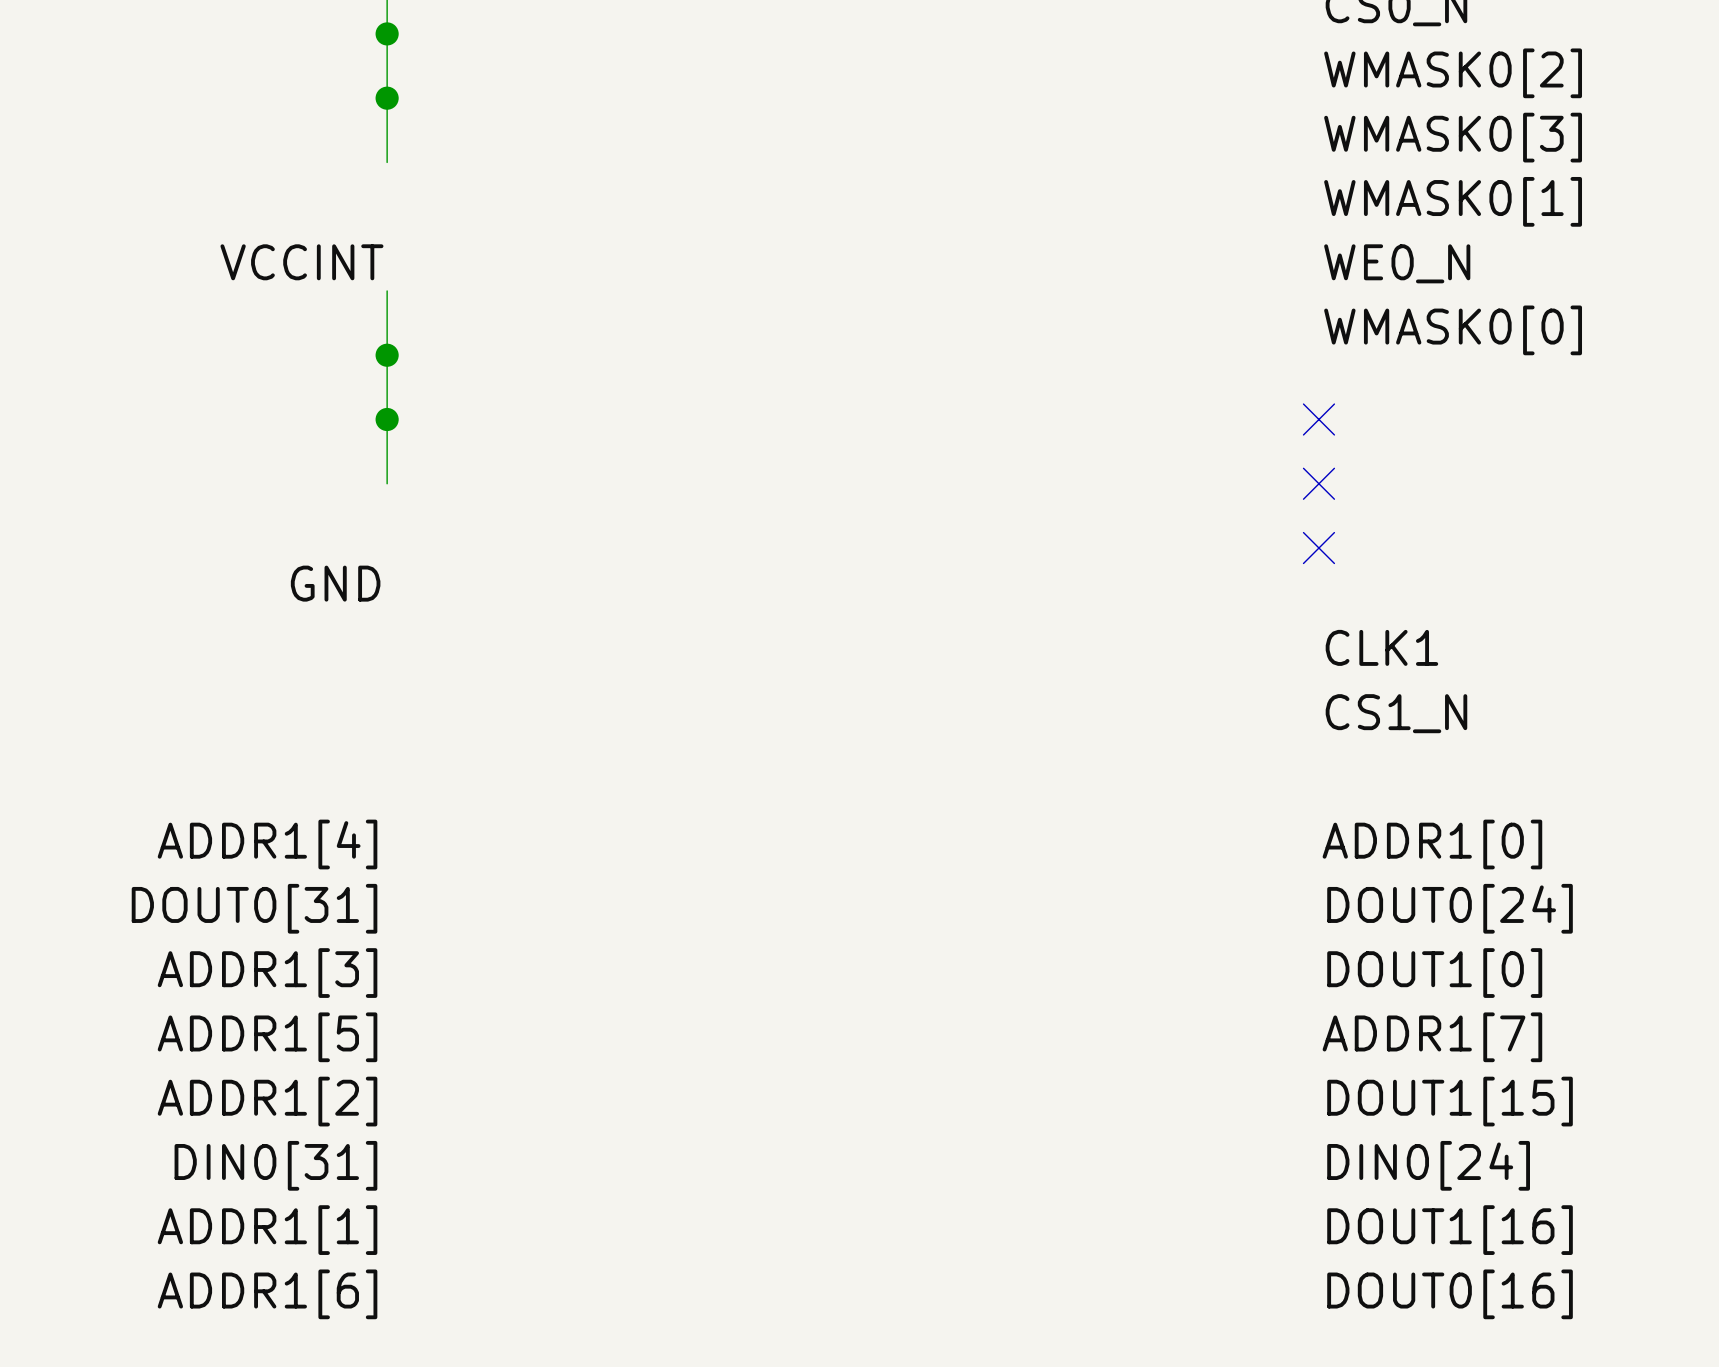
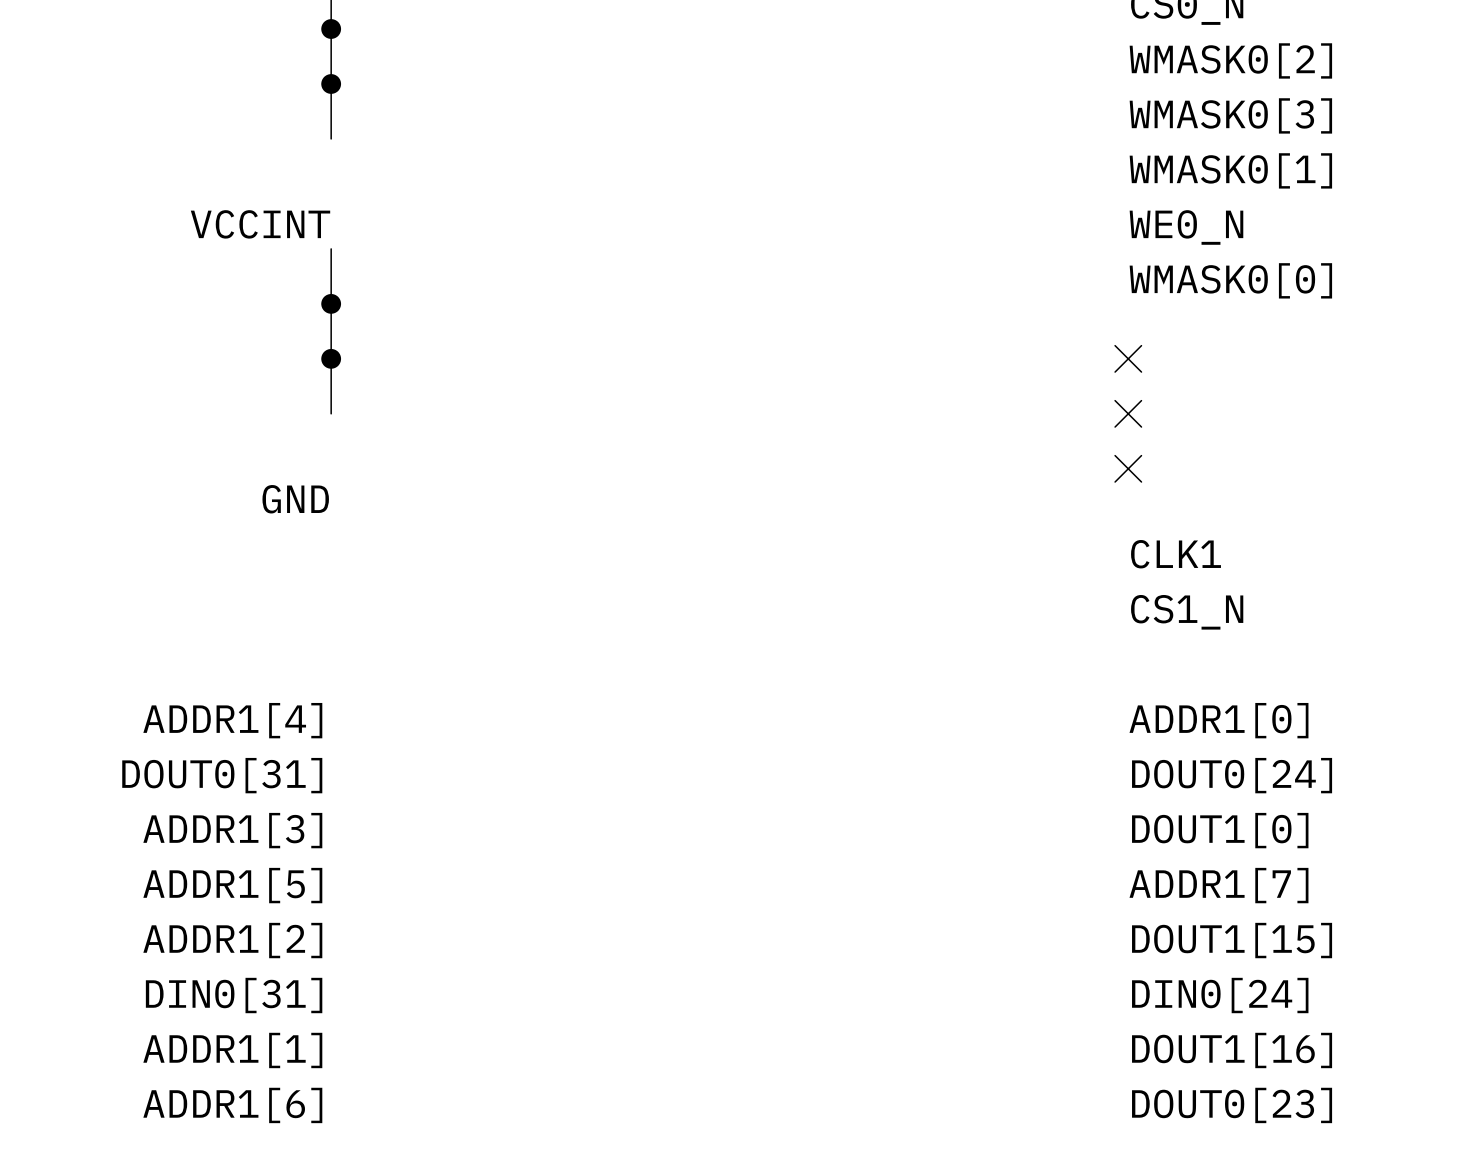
label: DOUT0[16] (1450, 1294) -> DOUT0[23] (1232, 1105)

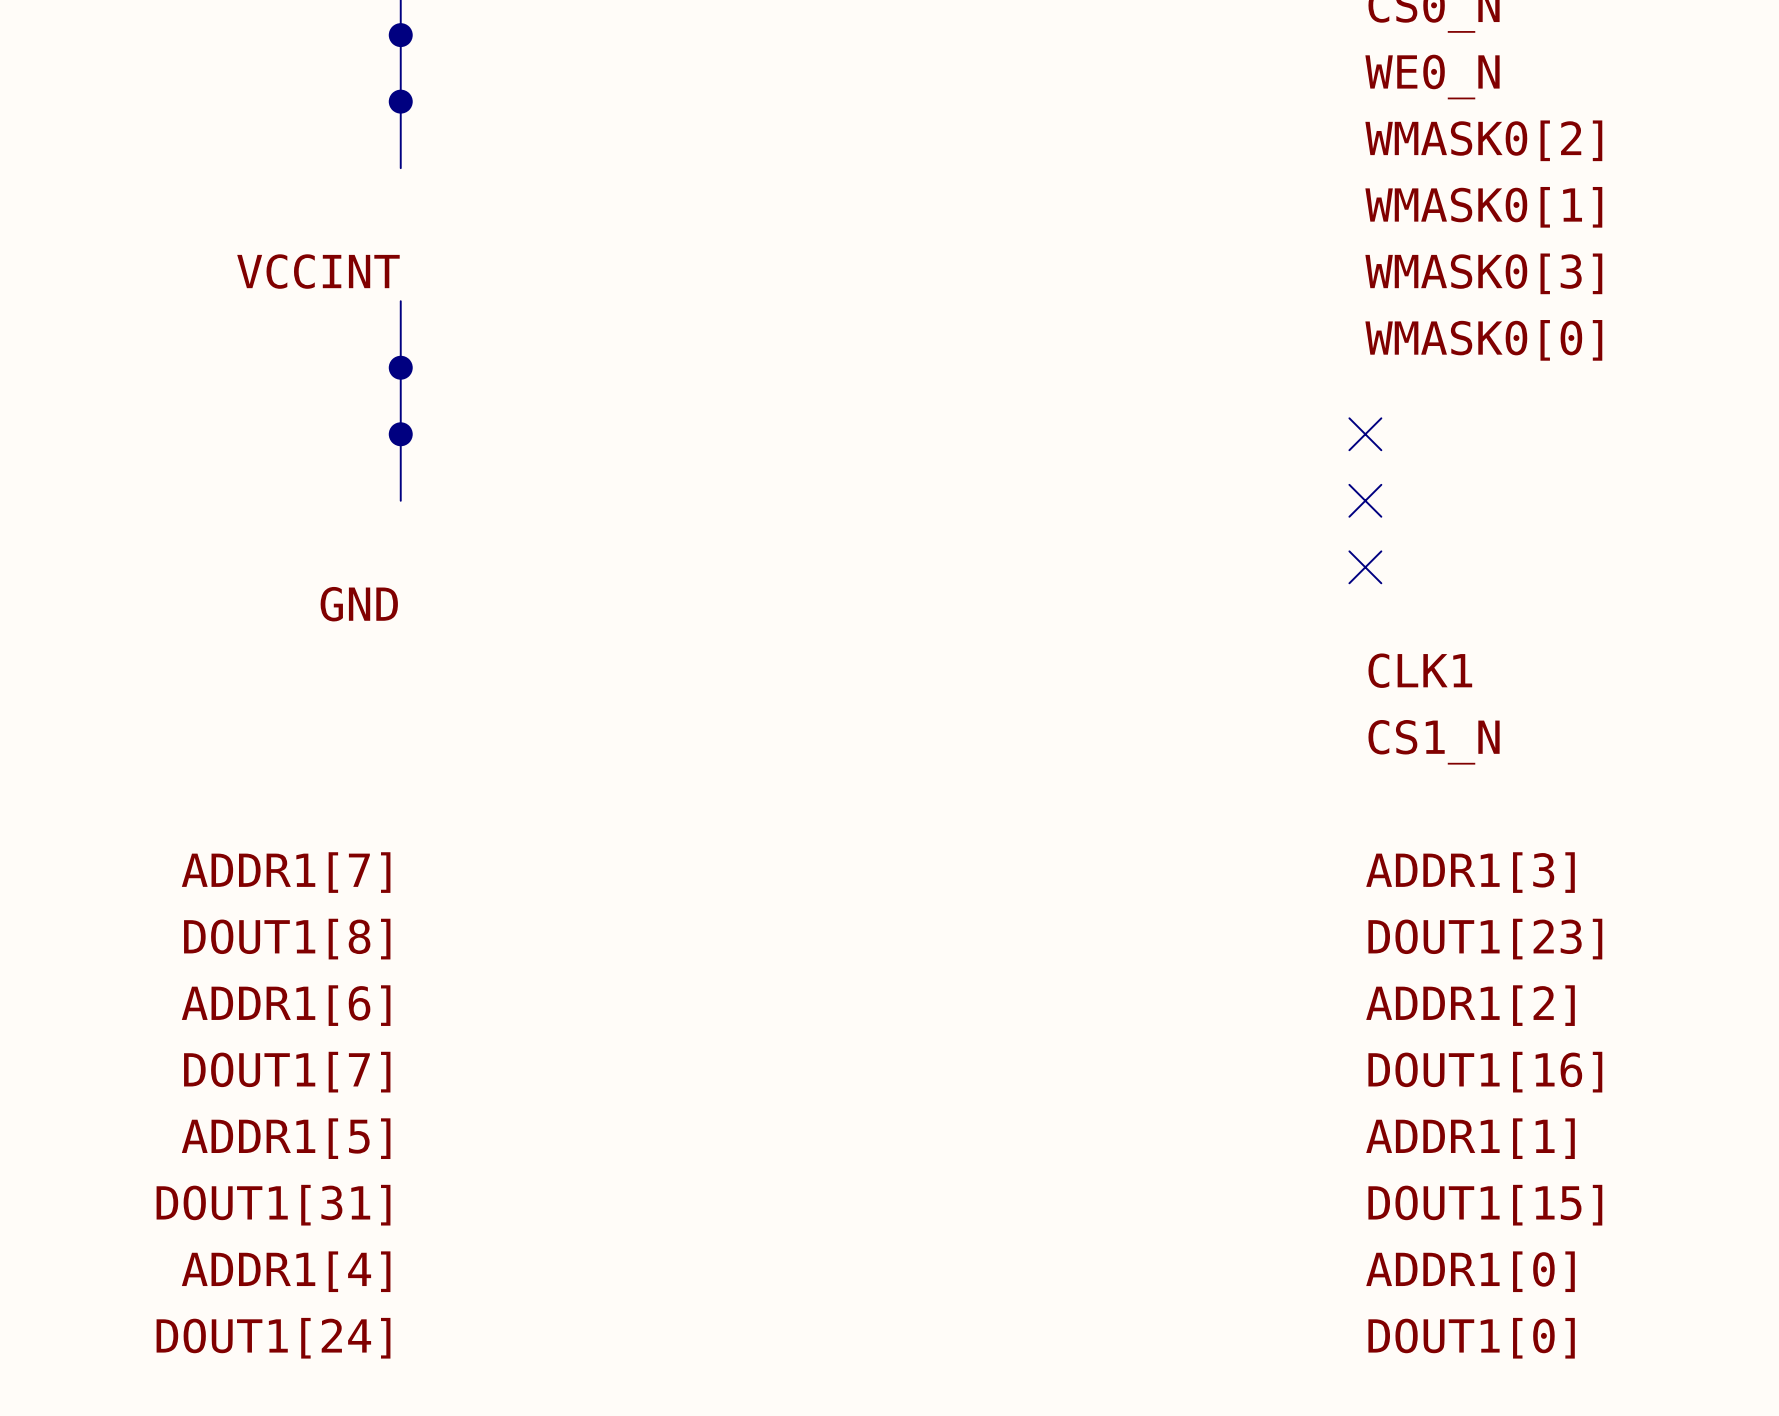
label: WMASK0[2] (1230, 60) -> WE0_N (1432, 77)
label: WMASK0[3] (1230, 115) -> WMASK0[2] (1483, 140)
label: WE0_N (1186, 227) -> WMASK0[3] (1483, 273)
label: ADDR1[4] (232, 720) -> ADDR1[7] (286, 872)
label: ADDR1[0] (1218, 720) -> ADDR1[3] (1470, 872)
label: DOUT0[31] (222, 775) -> DOUT1[8] (287, 939)
label: DOUT0[24] (1232, 775) -> DOUT1[23] (1485, 939)
label: ADDR1[3] (232, 830) -> ADDR1[6] (286, 1005)
label: DOUT1[0] (1220, 830) -> ADDR1[2] (1470, 1005)
label: ADDR1[5] (232, 885) -> DOUT1[7] (287, 1072)
label: ADDR1[7] (1218, 885) -> DOUT1[16] (1485, 1072)
label: ADDR1[2] (232, 940) -> ADDR1[5] (286, 1138)
label: DOUT1[15] (1232, 940) -> ADDR1[1] (1470, 1138)
label: DIN0[31] (234, 995) -> DOUT1[31] (273, 1205)
label: DIN0[24] (1220, 995) -> DOUT1[15] (1485, 1205)
label: ADDR1[1] (232, 1050) -> ADDR1[4] (286, 1271)
label: DOUT1[16] (1232, 1050) -> ADDR1[0] (1470, 1271)
label: ADDR1[6] (232, 1105) -> DOUT1[24] (273, 1338)
label: DOUT0[23] (1232, 1105) -> DOUT1[0] (1471, 1338)

